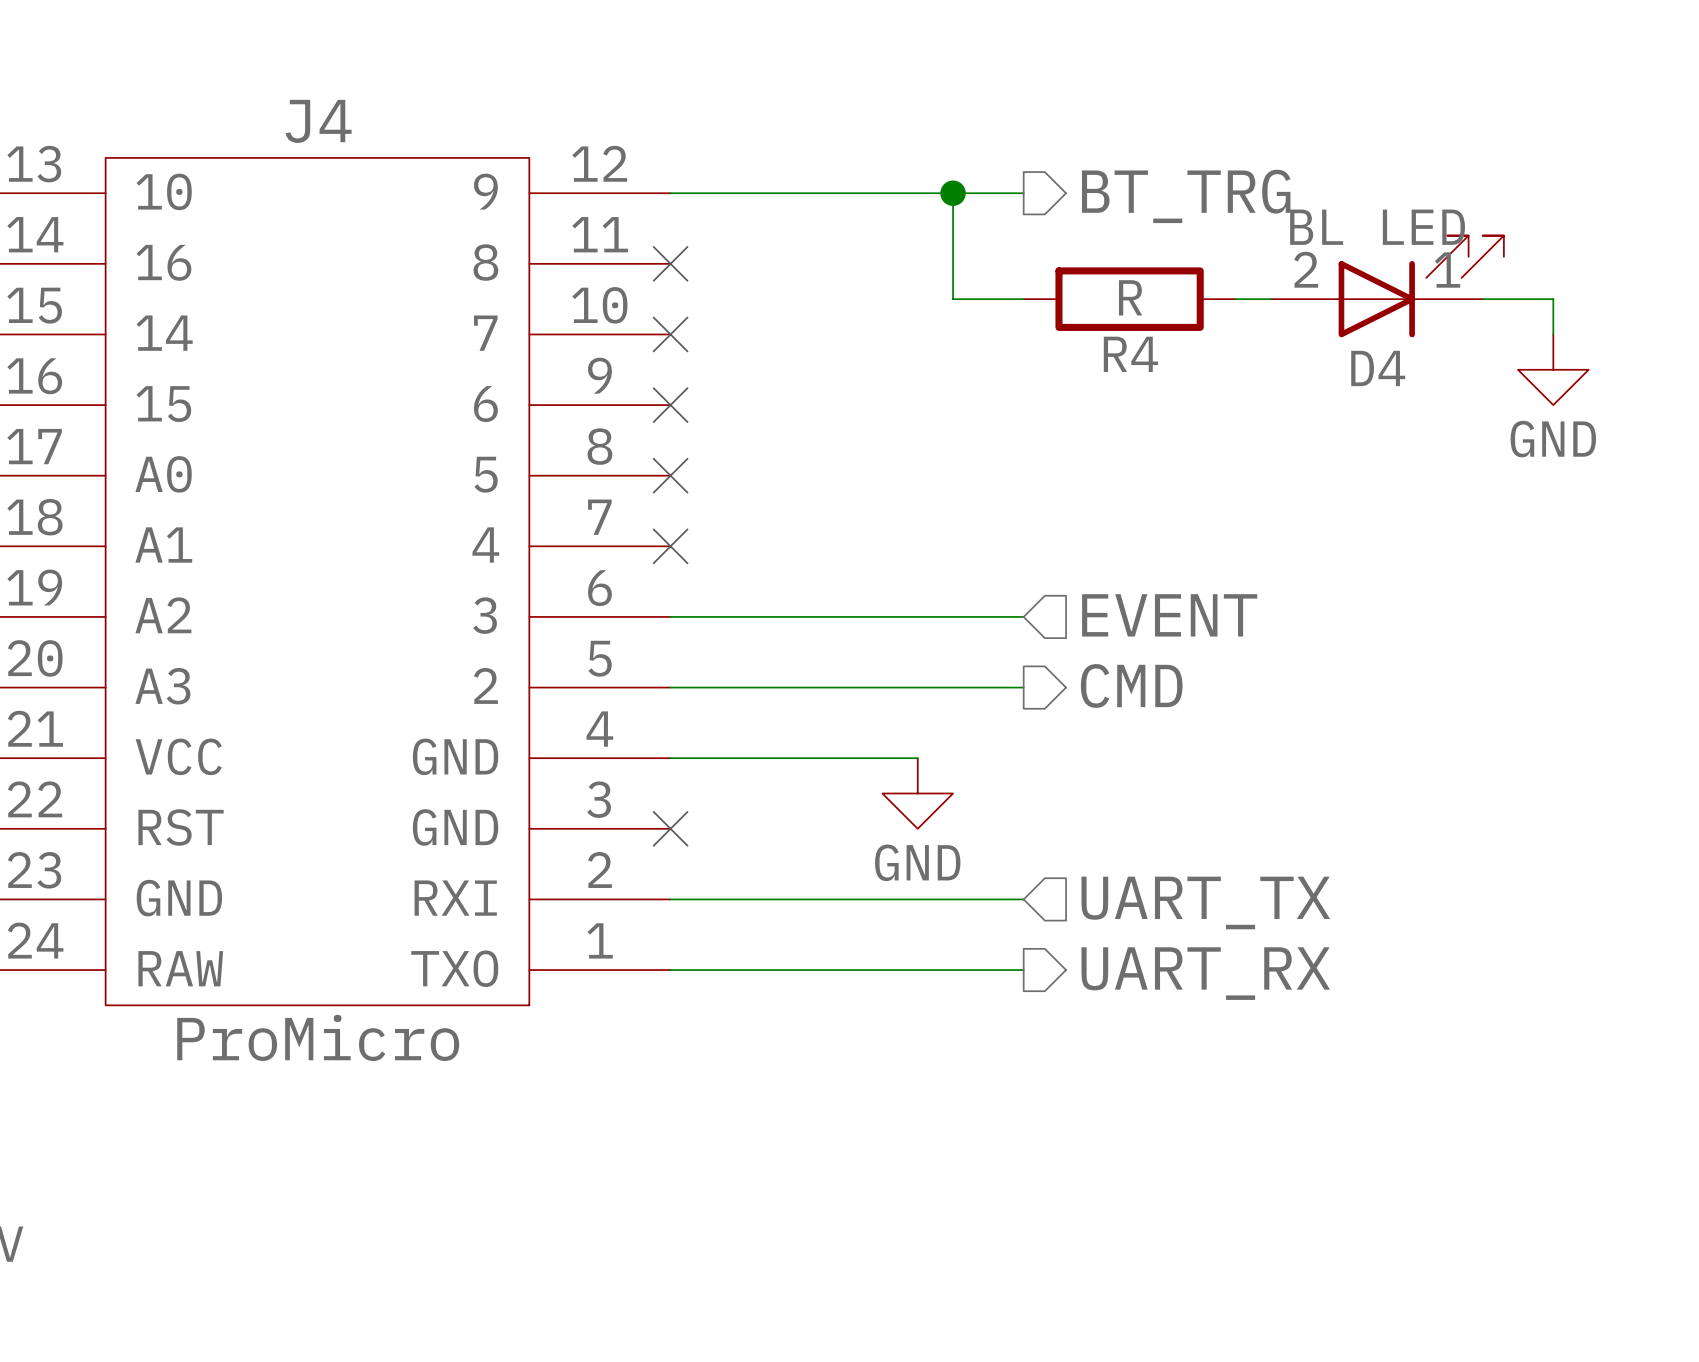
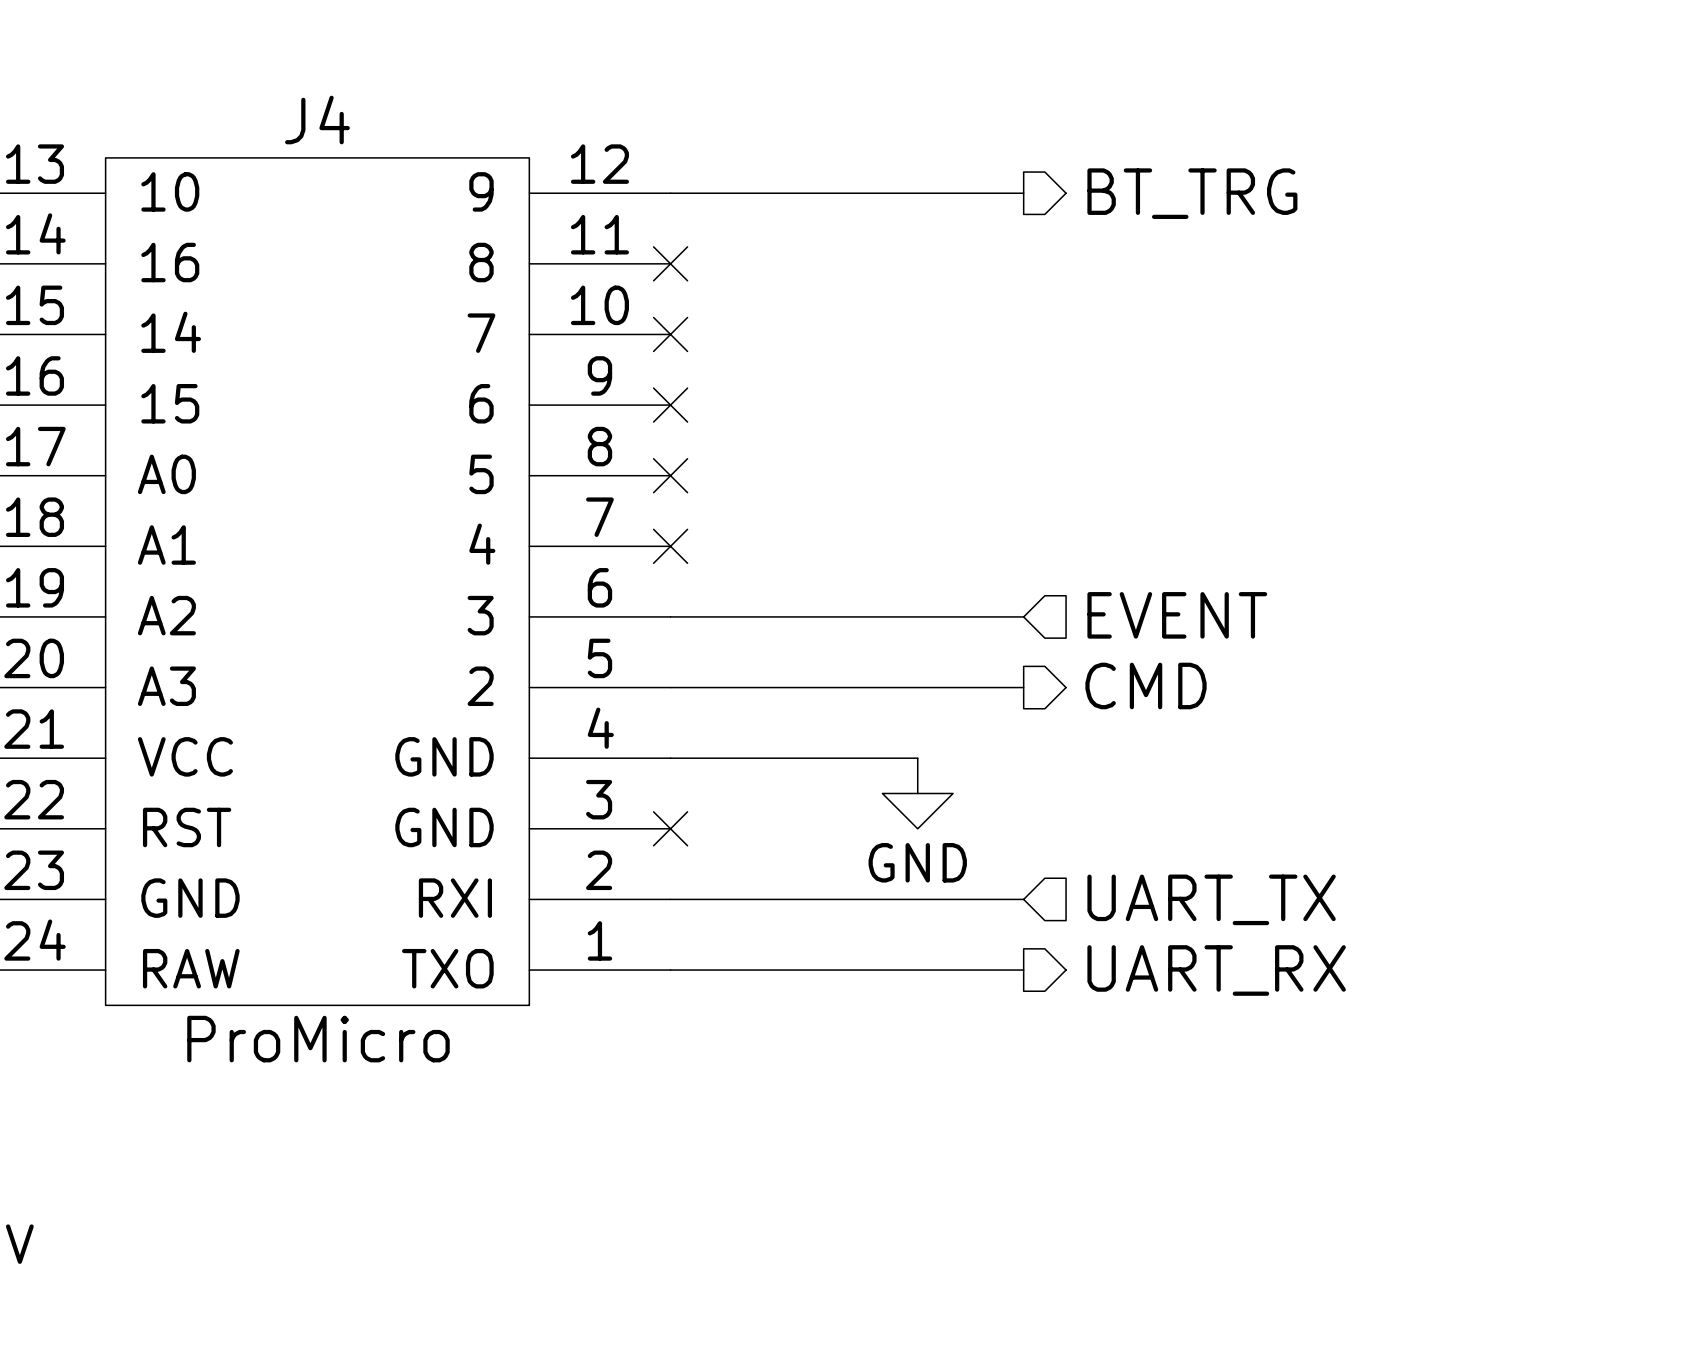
wire: (953, 193) (953, 299) (1023, 299) -> none
junction: (953, 193) -> none
D4: BL LED (1387, 286) -> none
R4: R (1129, 299) -> none
wire: (1235, 299) (1270, 299) -> none
wire: (1482, 299) (1553, 299) (1553, 334) -> none
power symbol: GND (1553, 369) -> none

